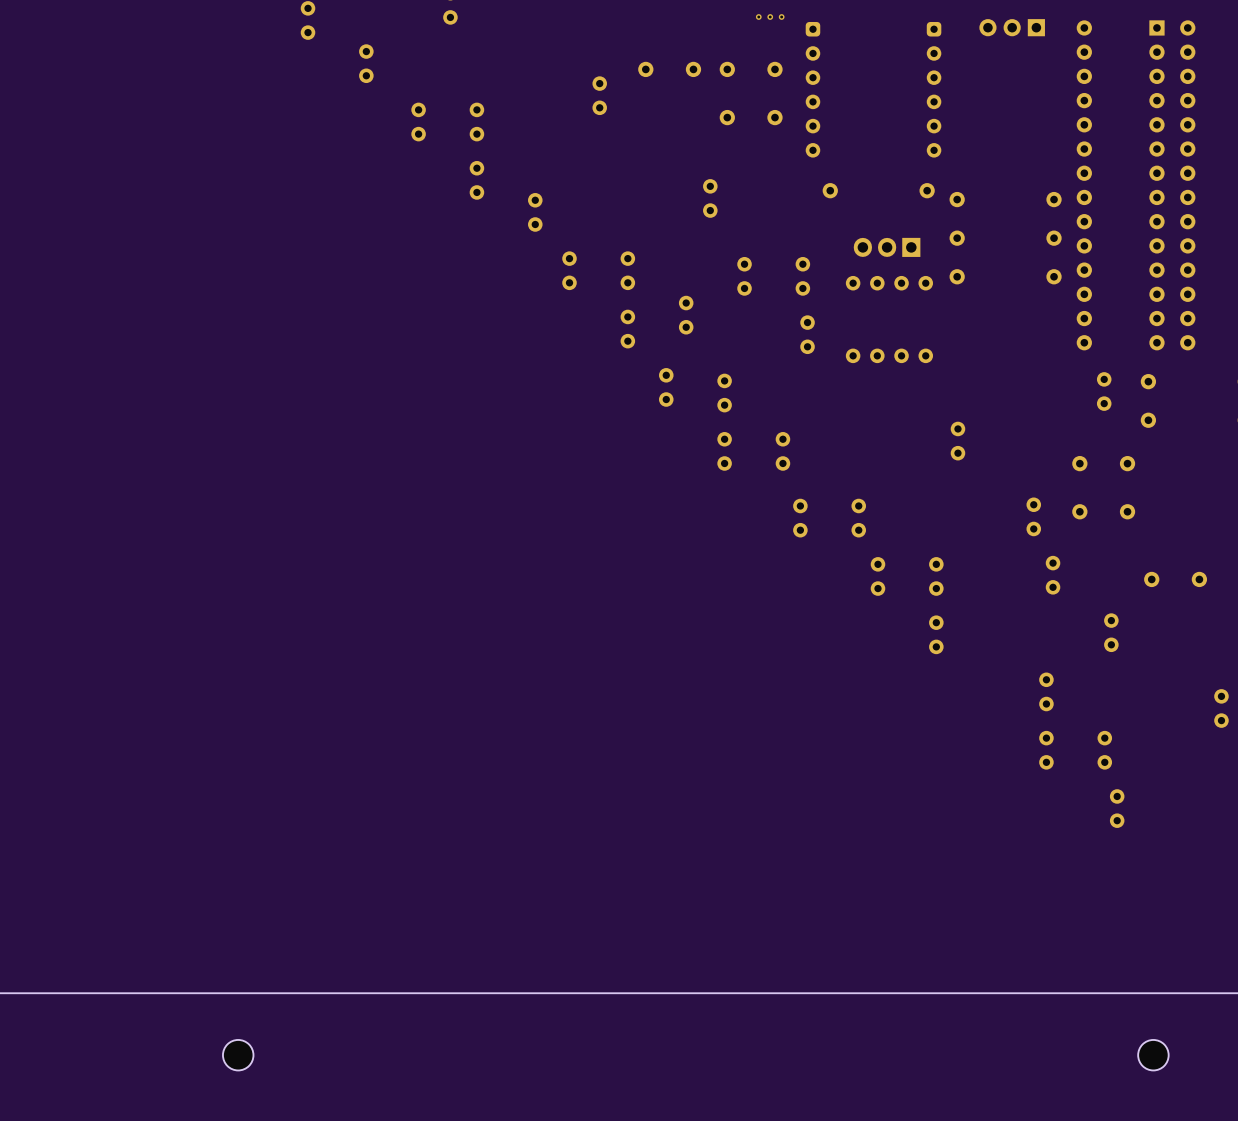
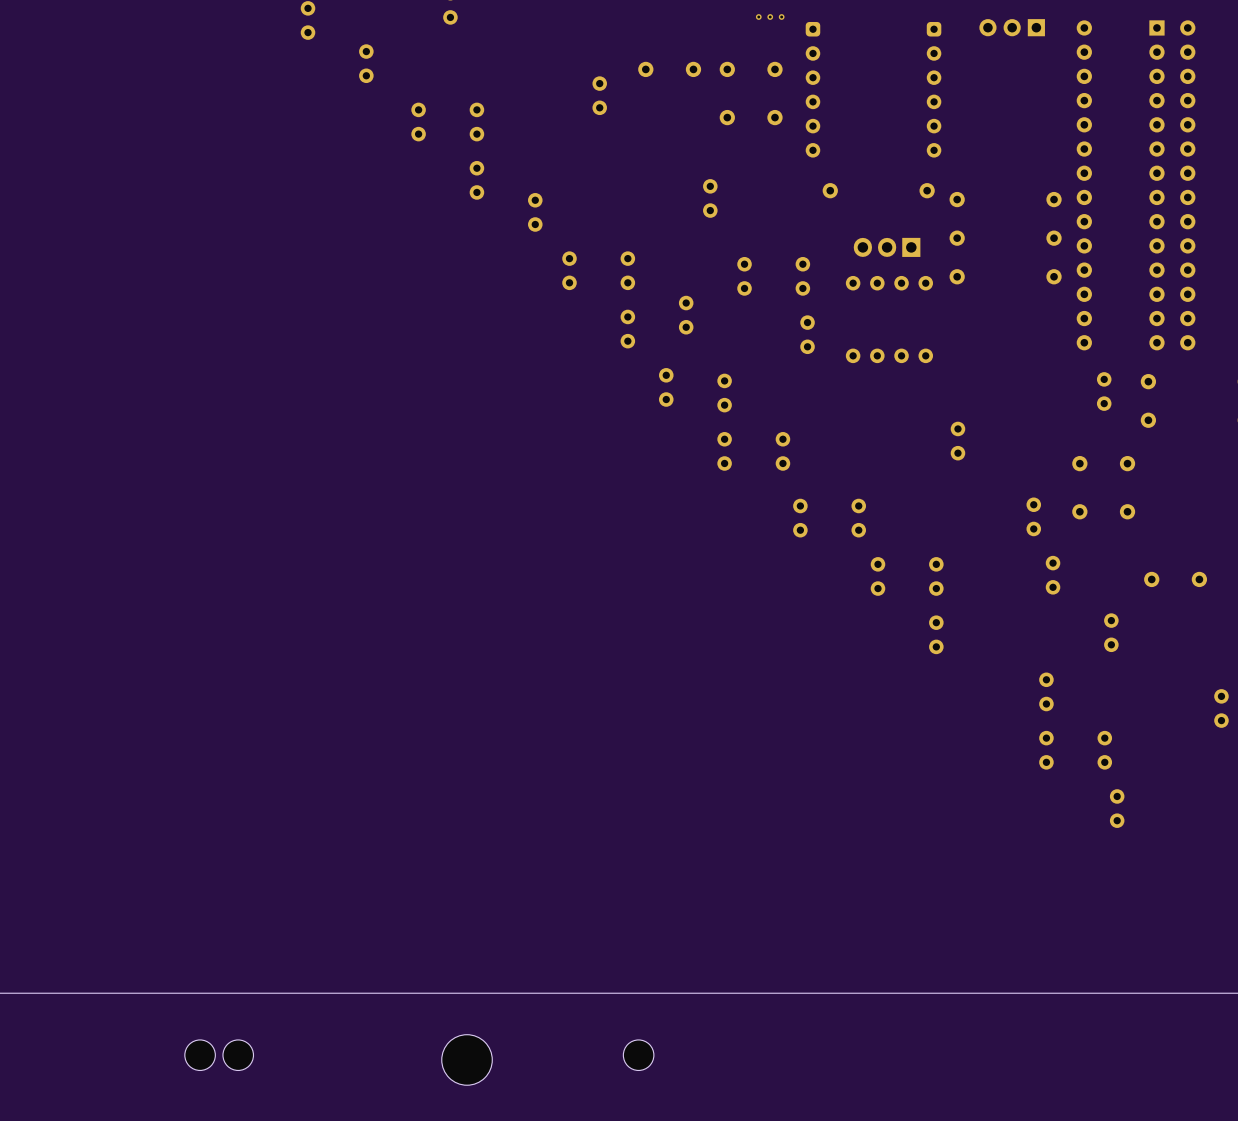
part: none -> (200, 1055)
part: none -> (638, 1055)
part: (1153, 1055) -> none
part: none -> (467, 1059)

